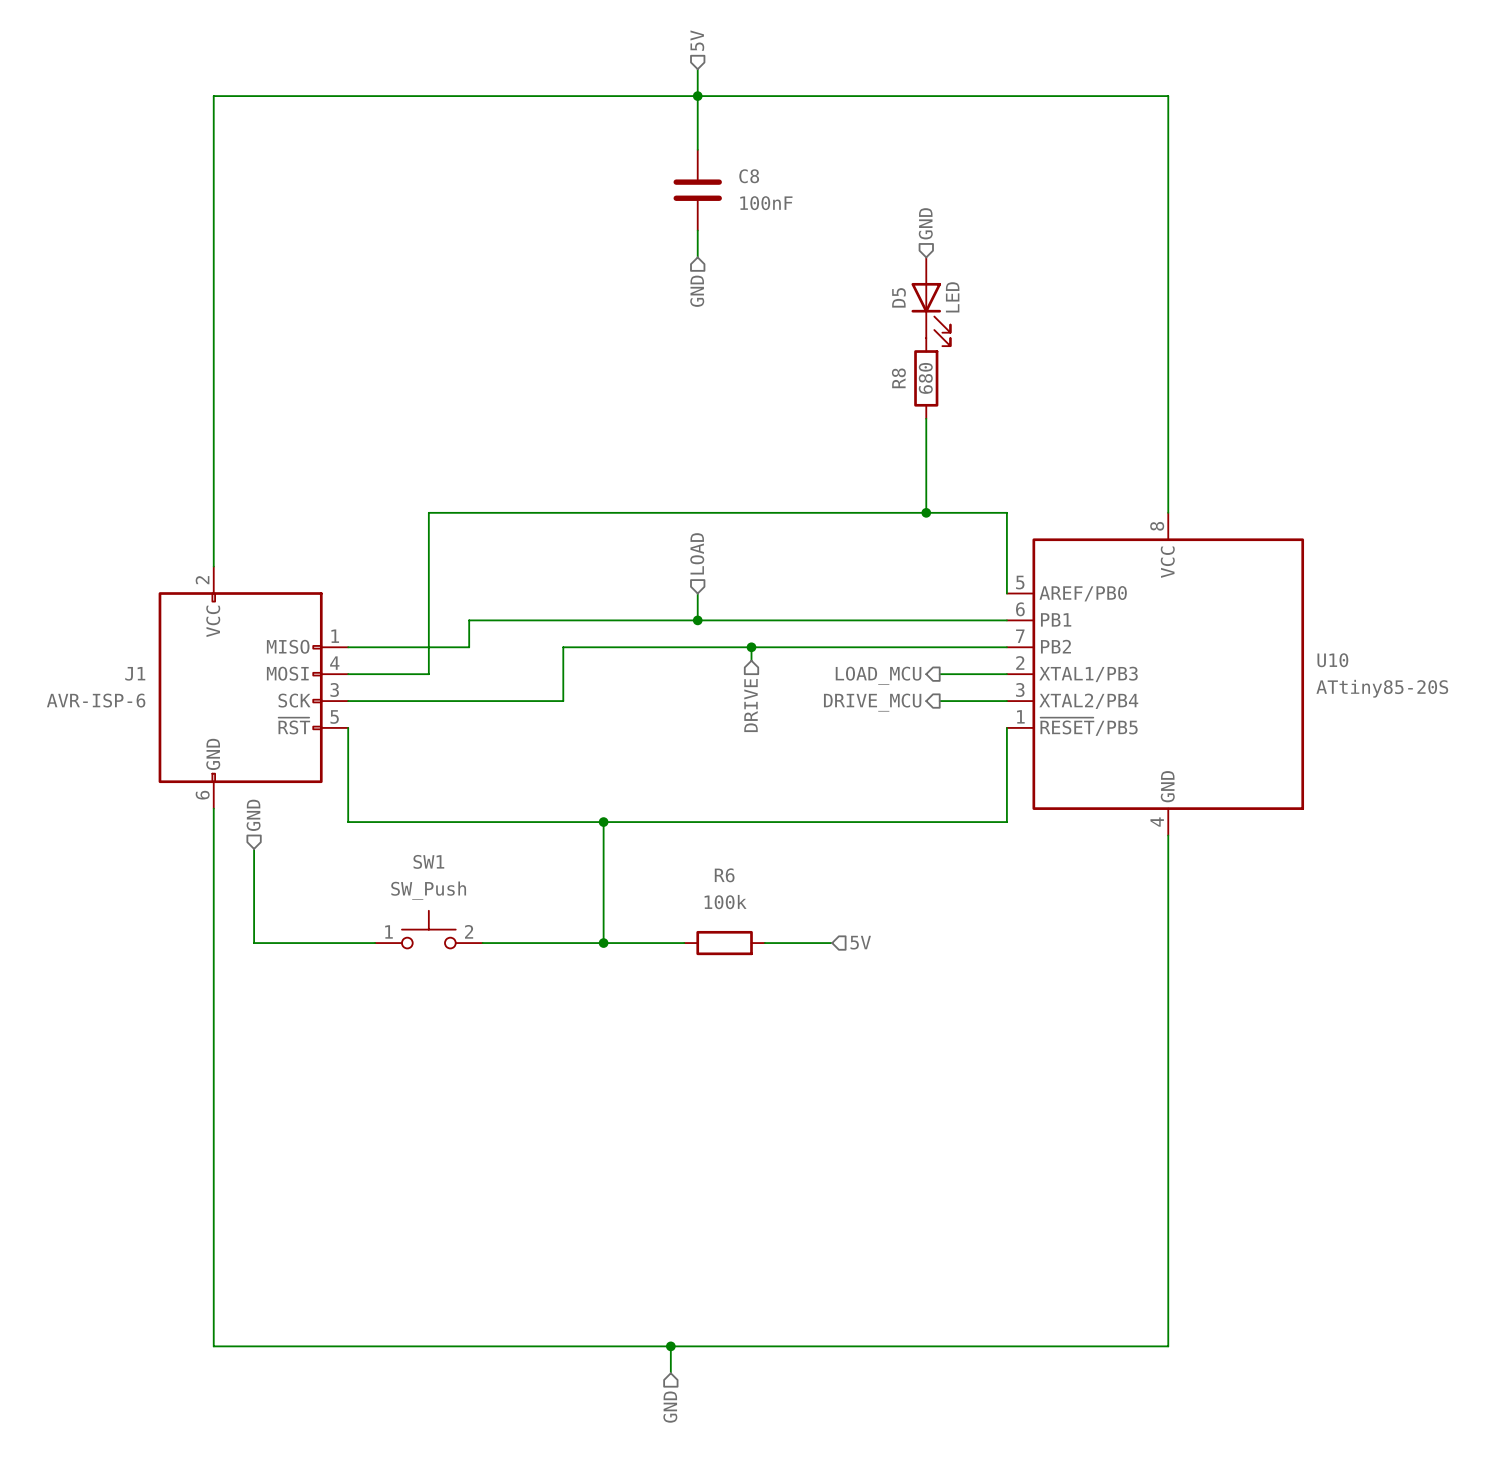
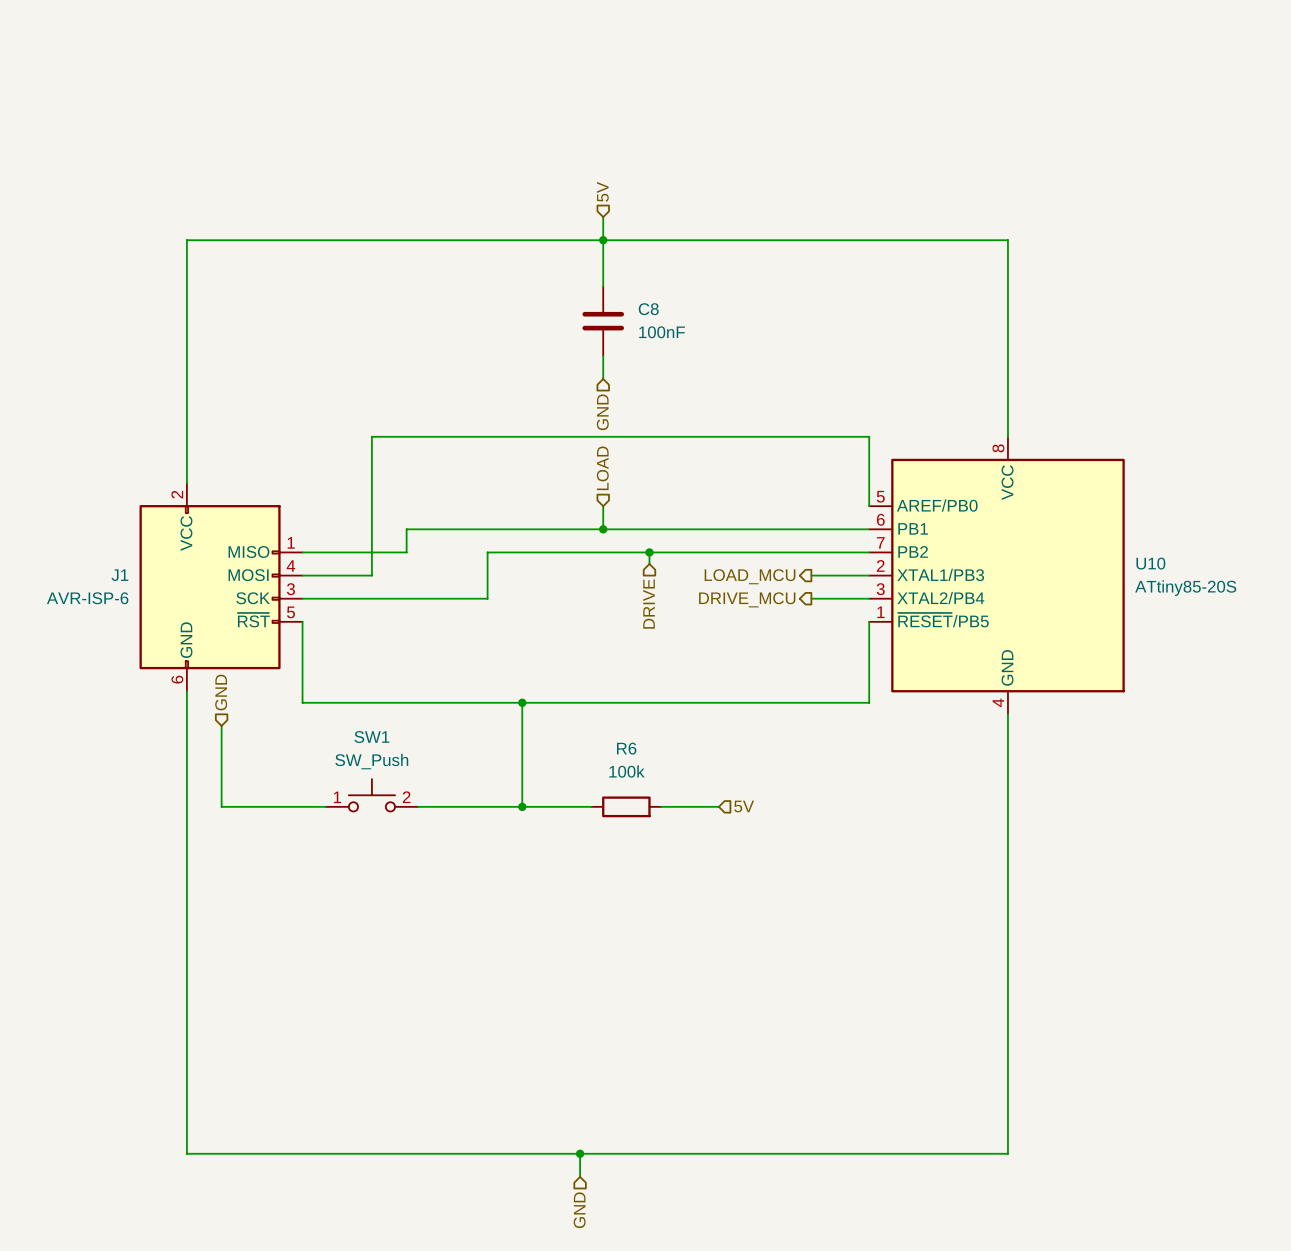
hierarchical label position: 5V (697, 40) -> 5V (602, 191)
wire: (697, 69) (697, 149) -> none
junction: (697, 96) -> none
C8 position: (697, 190) -> (603, 321)
hierarchical label: GND (925, 223) -> none
wire: (697, 230) (697, 257) -> (603, 286) (603, 217)
wire: (213, 284) (213, 96) (1168, 96) (1168, 284) -> (186, 240) (1007, 240)
junction: none -> (603, 240)
hierarchical label: GND (697, 291) -> none
D5: LED (930, 301) -> none
R8: 680 (926, 378) -> none
wire: none -> (603, 355) (603, 378)
wire: (926, 418) (926, 512) -> none
hierarchical label: none -> GND (602, 412)
junction: (926, 512) -> none

